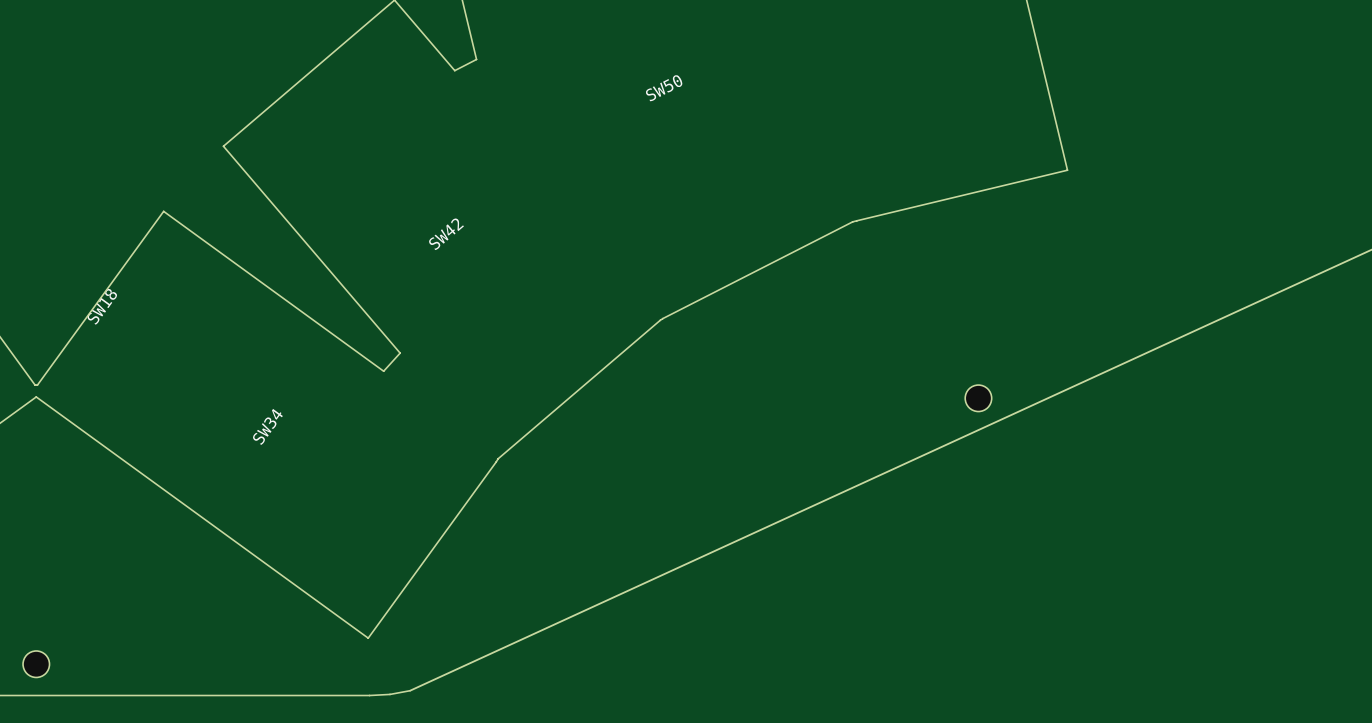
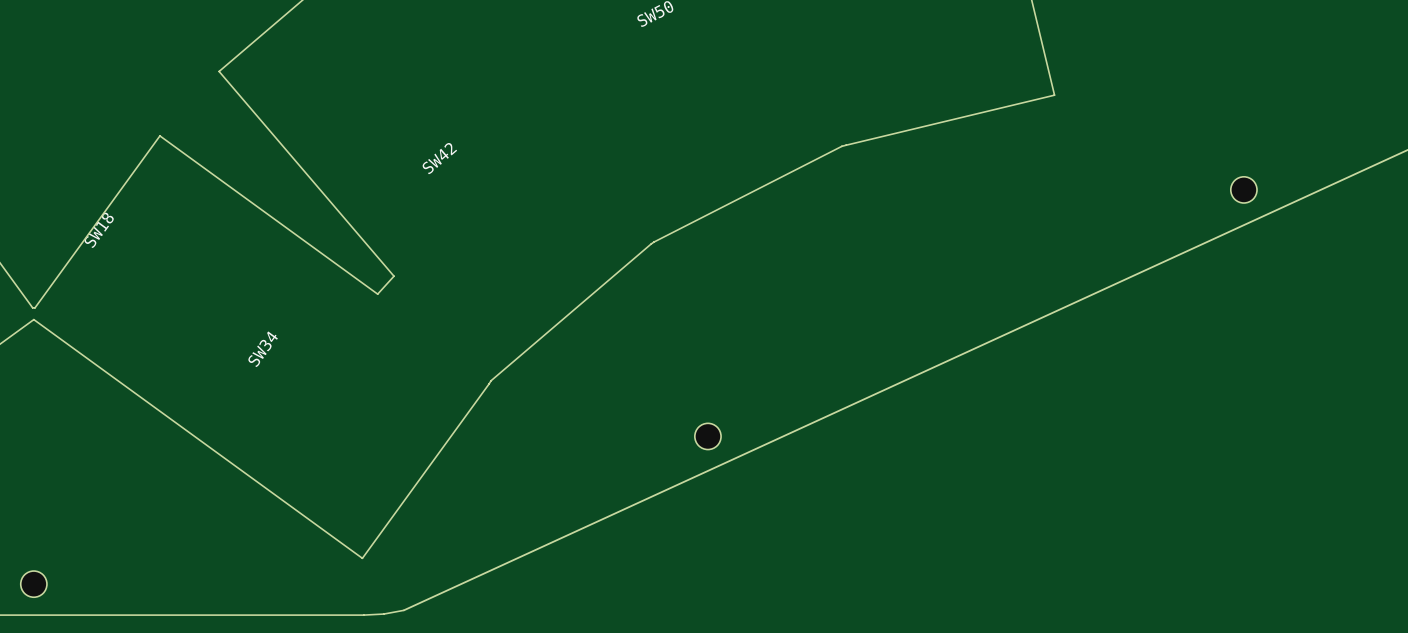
part: none -> (1243, 189)
part: (978, 398) -> none
part: none -> (707, 436)

